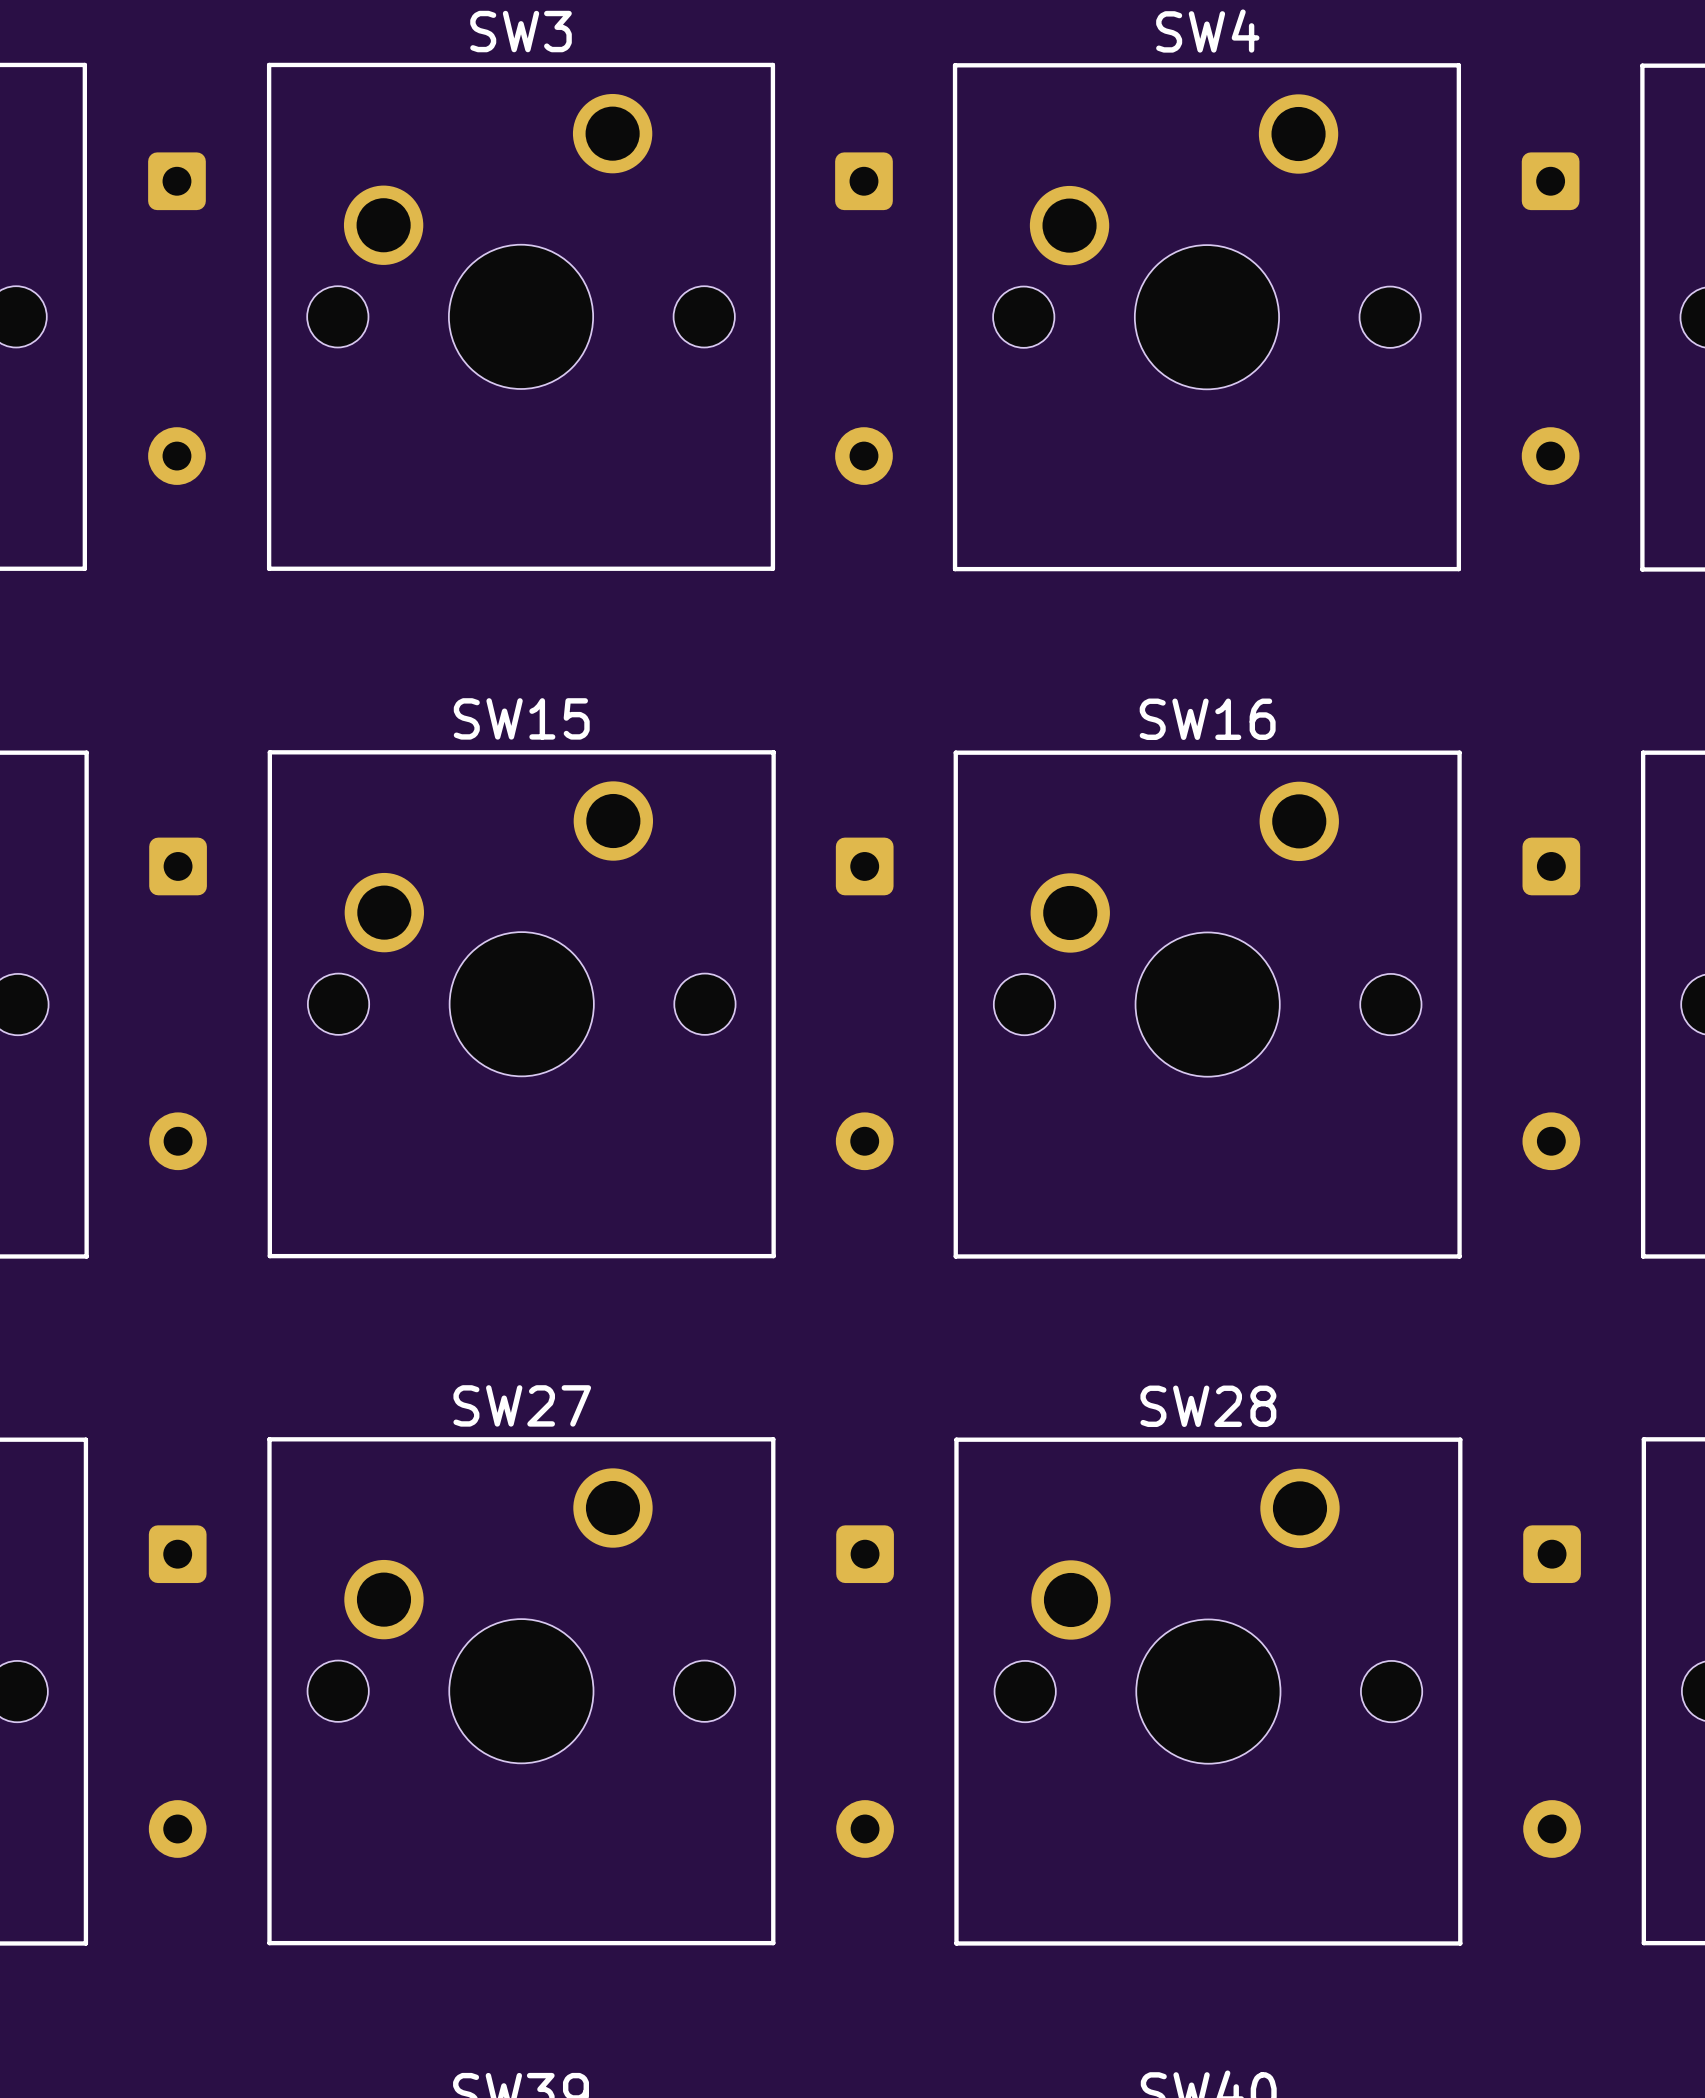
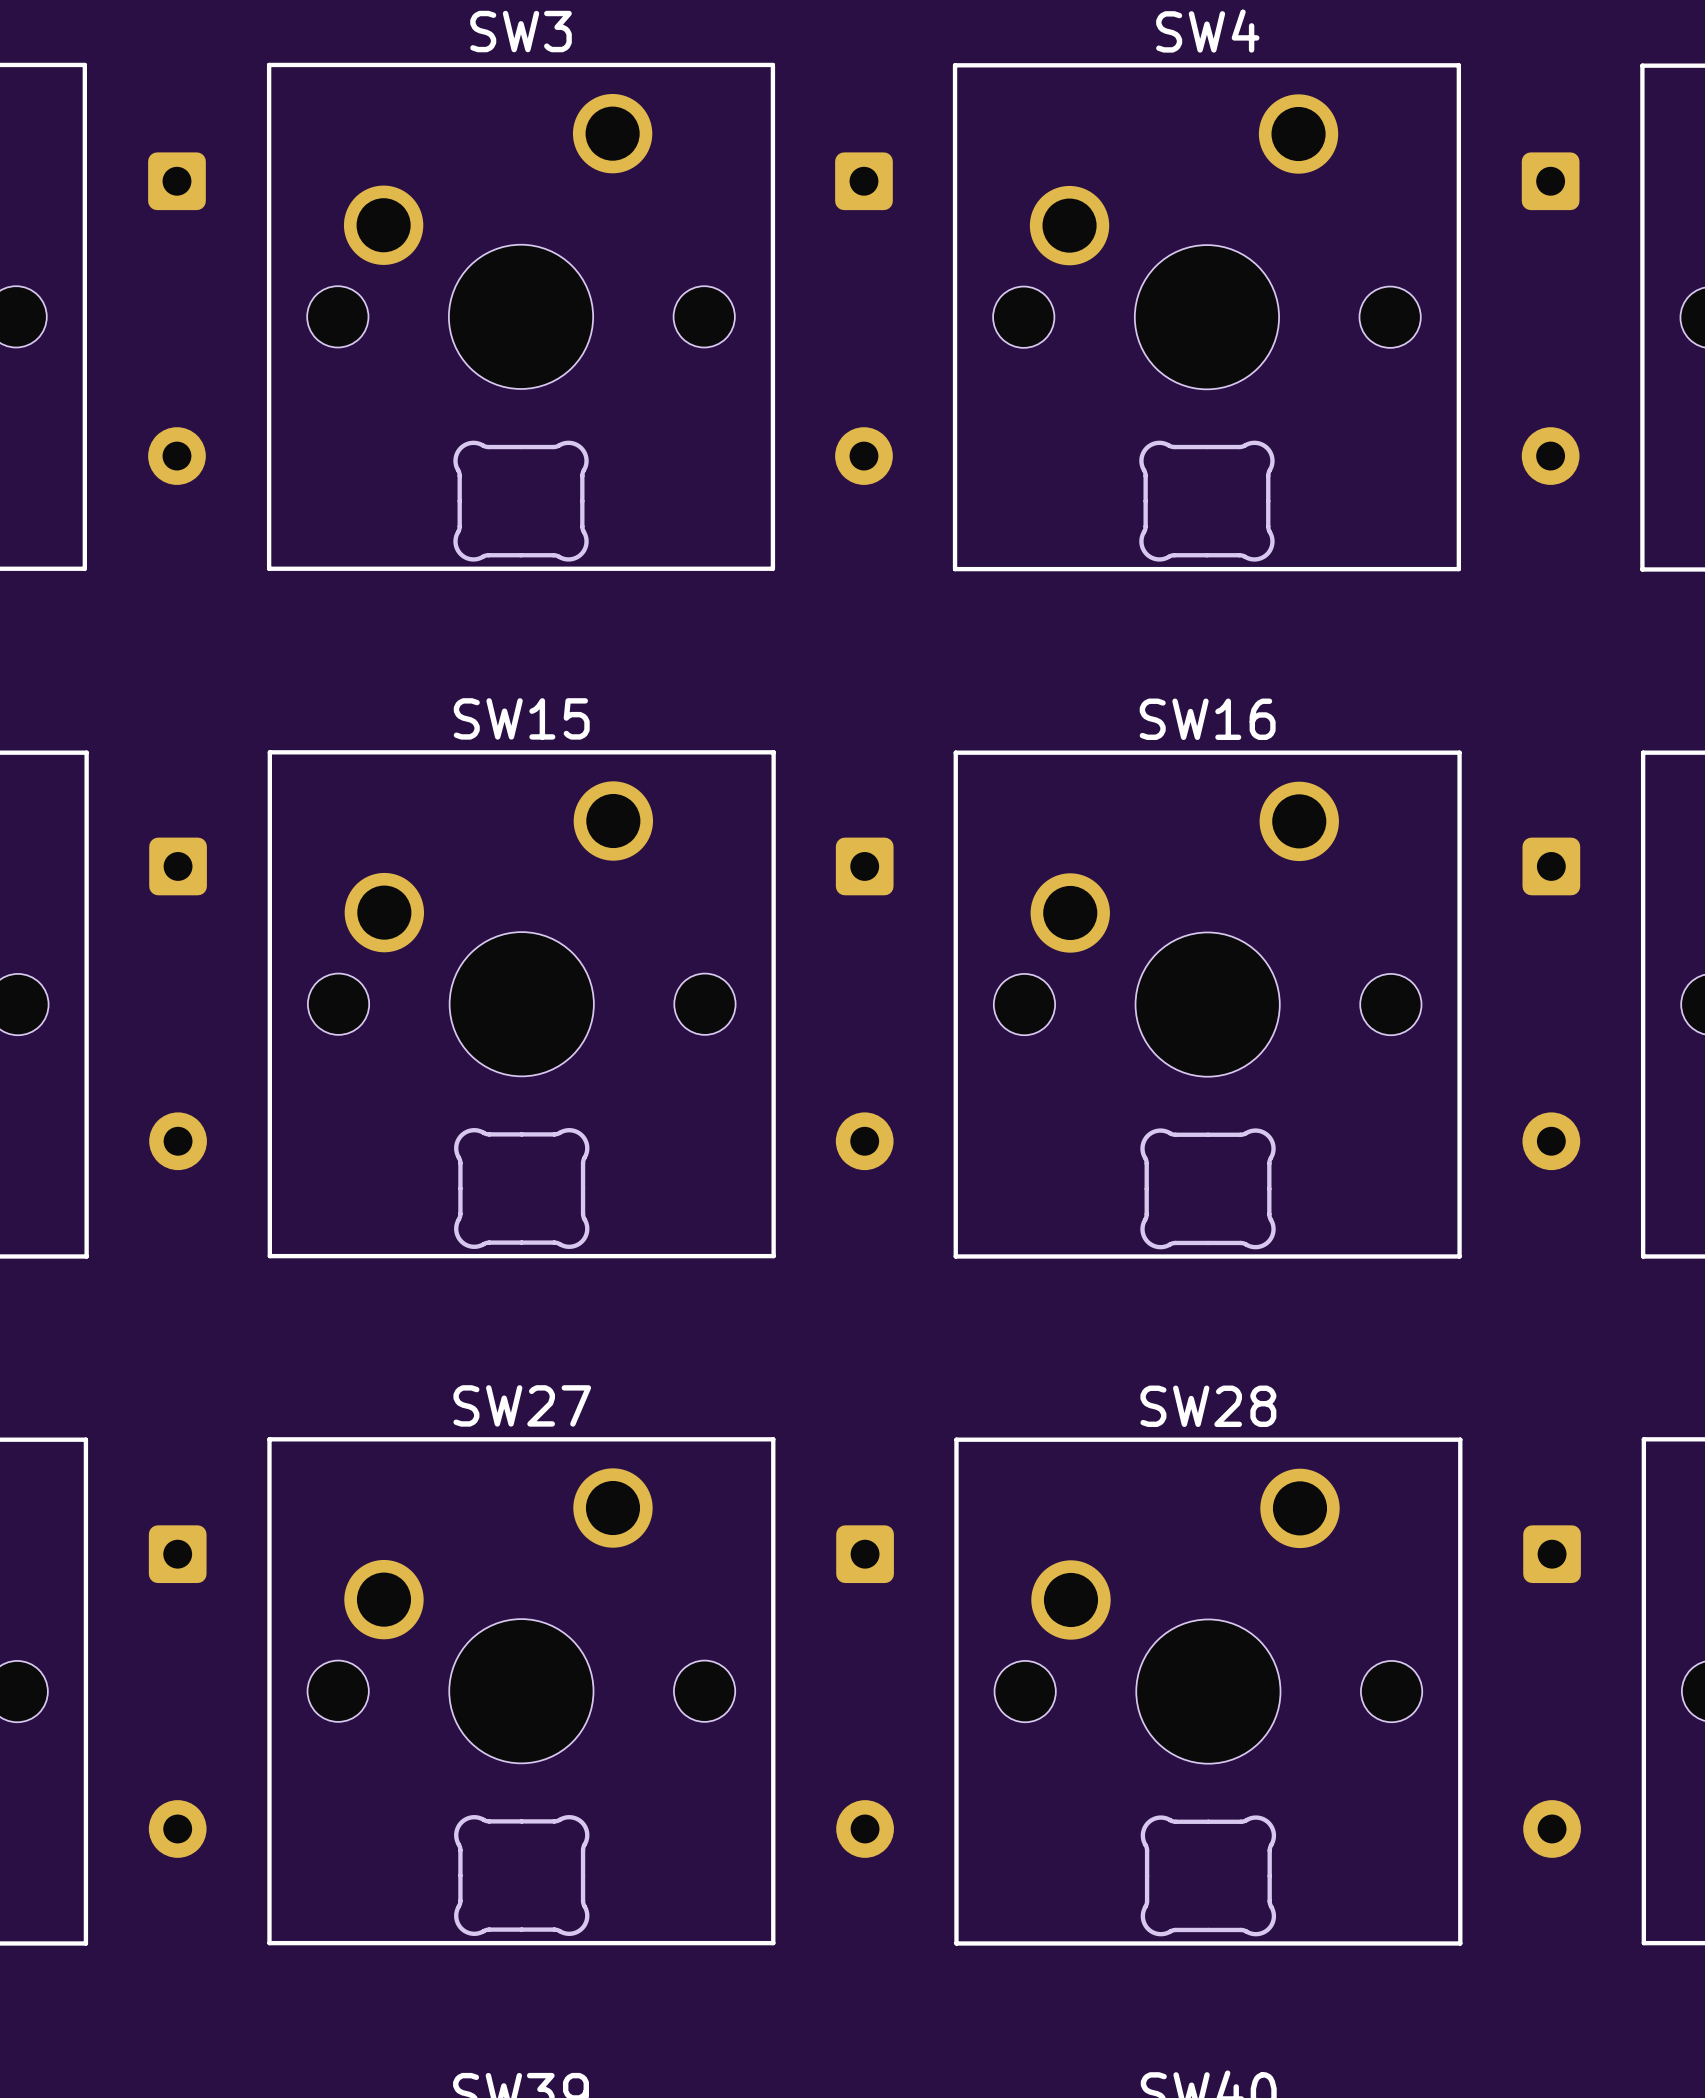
part: none -> (521, 501)
part: none -> (1206, 501)
part: none -> (521, 1188)
part: none -> (1208, 1188)
part: none -> (521, 1875)
part: none -> (1208, 1875)

